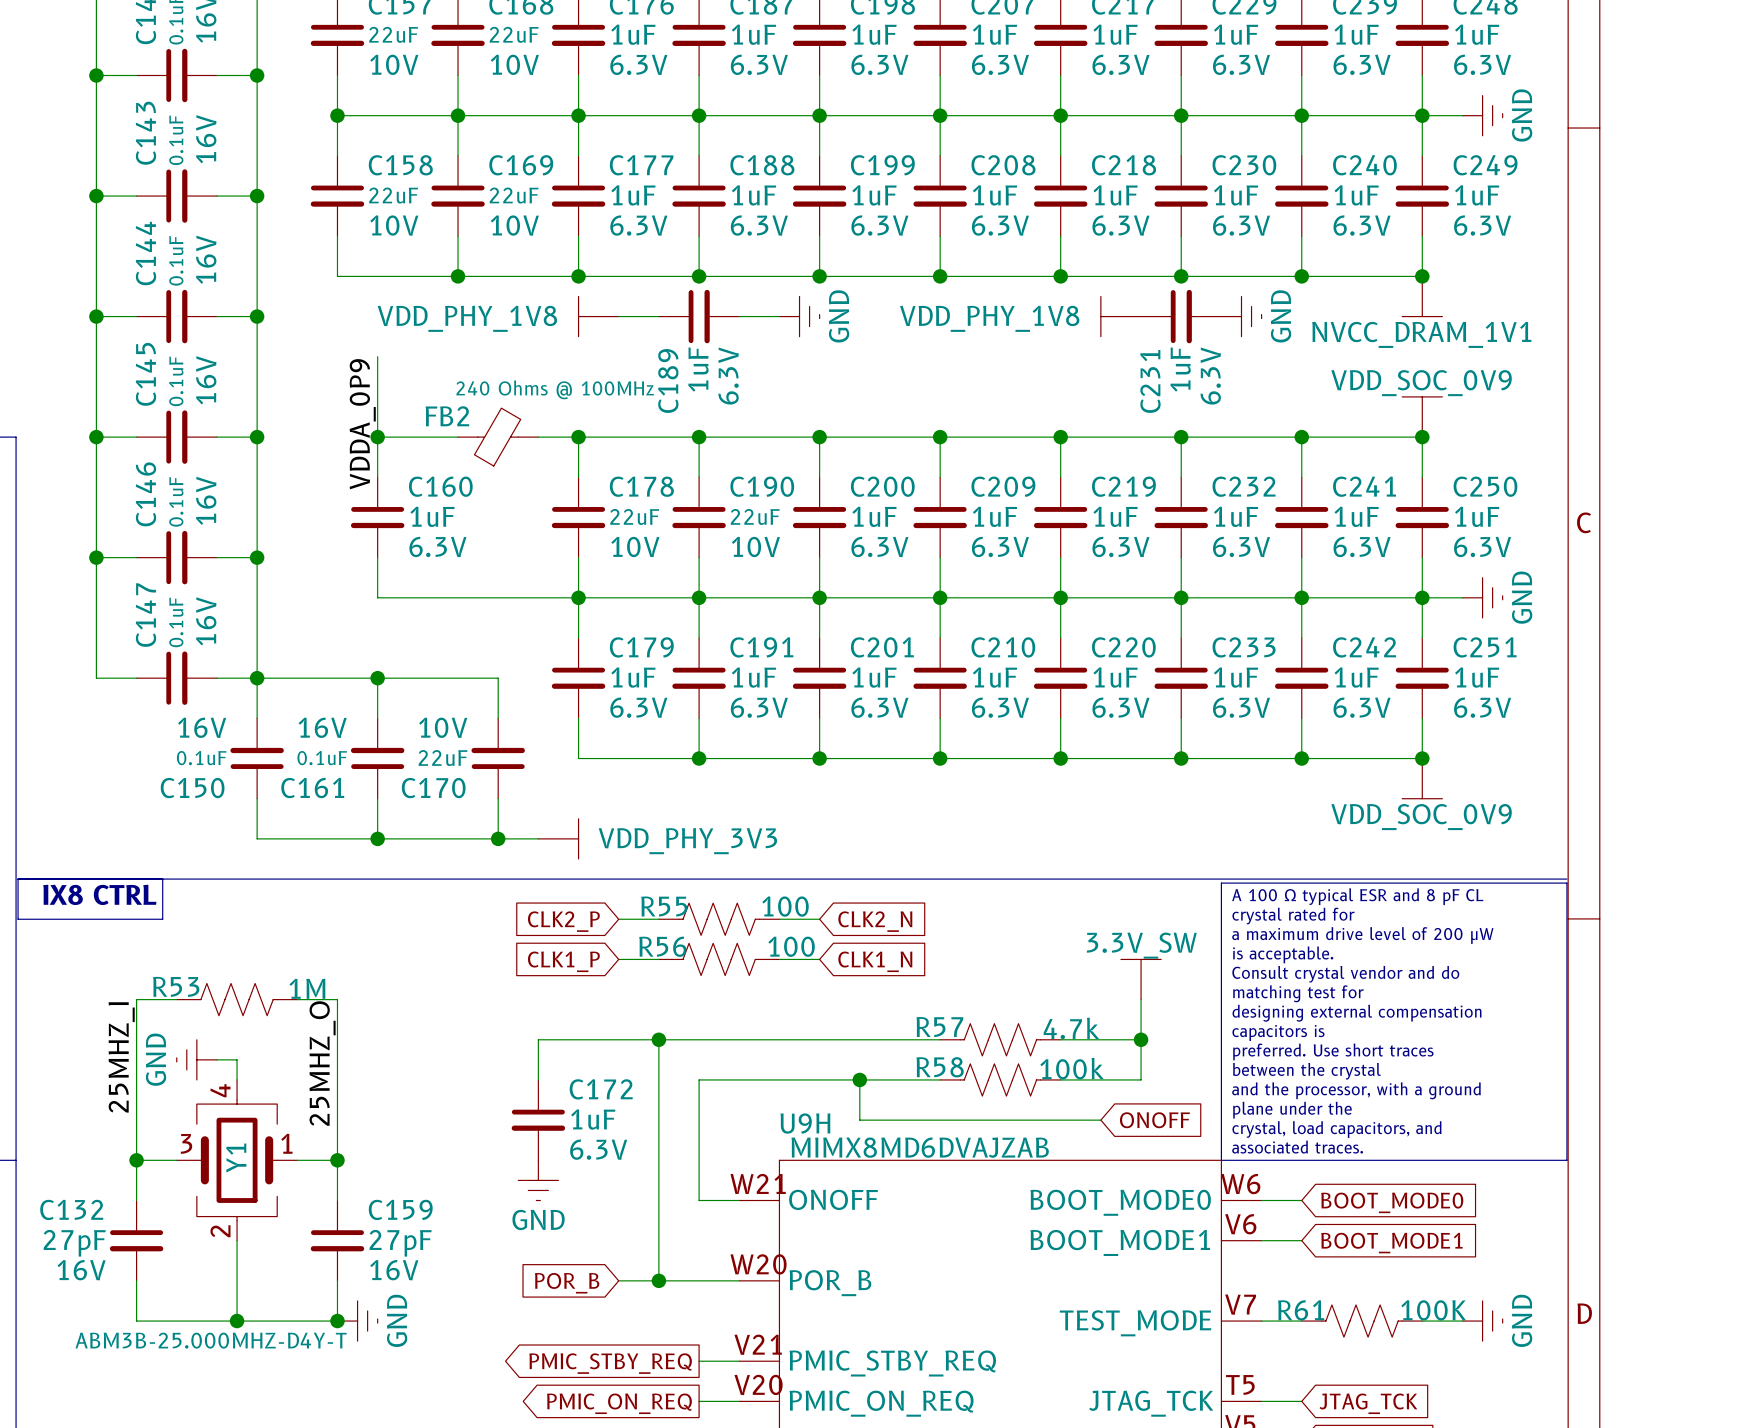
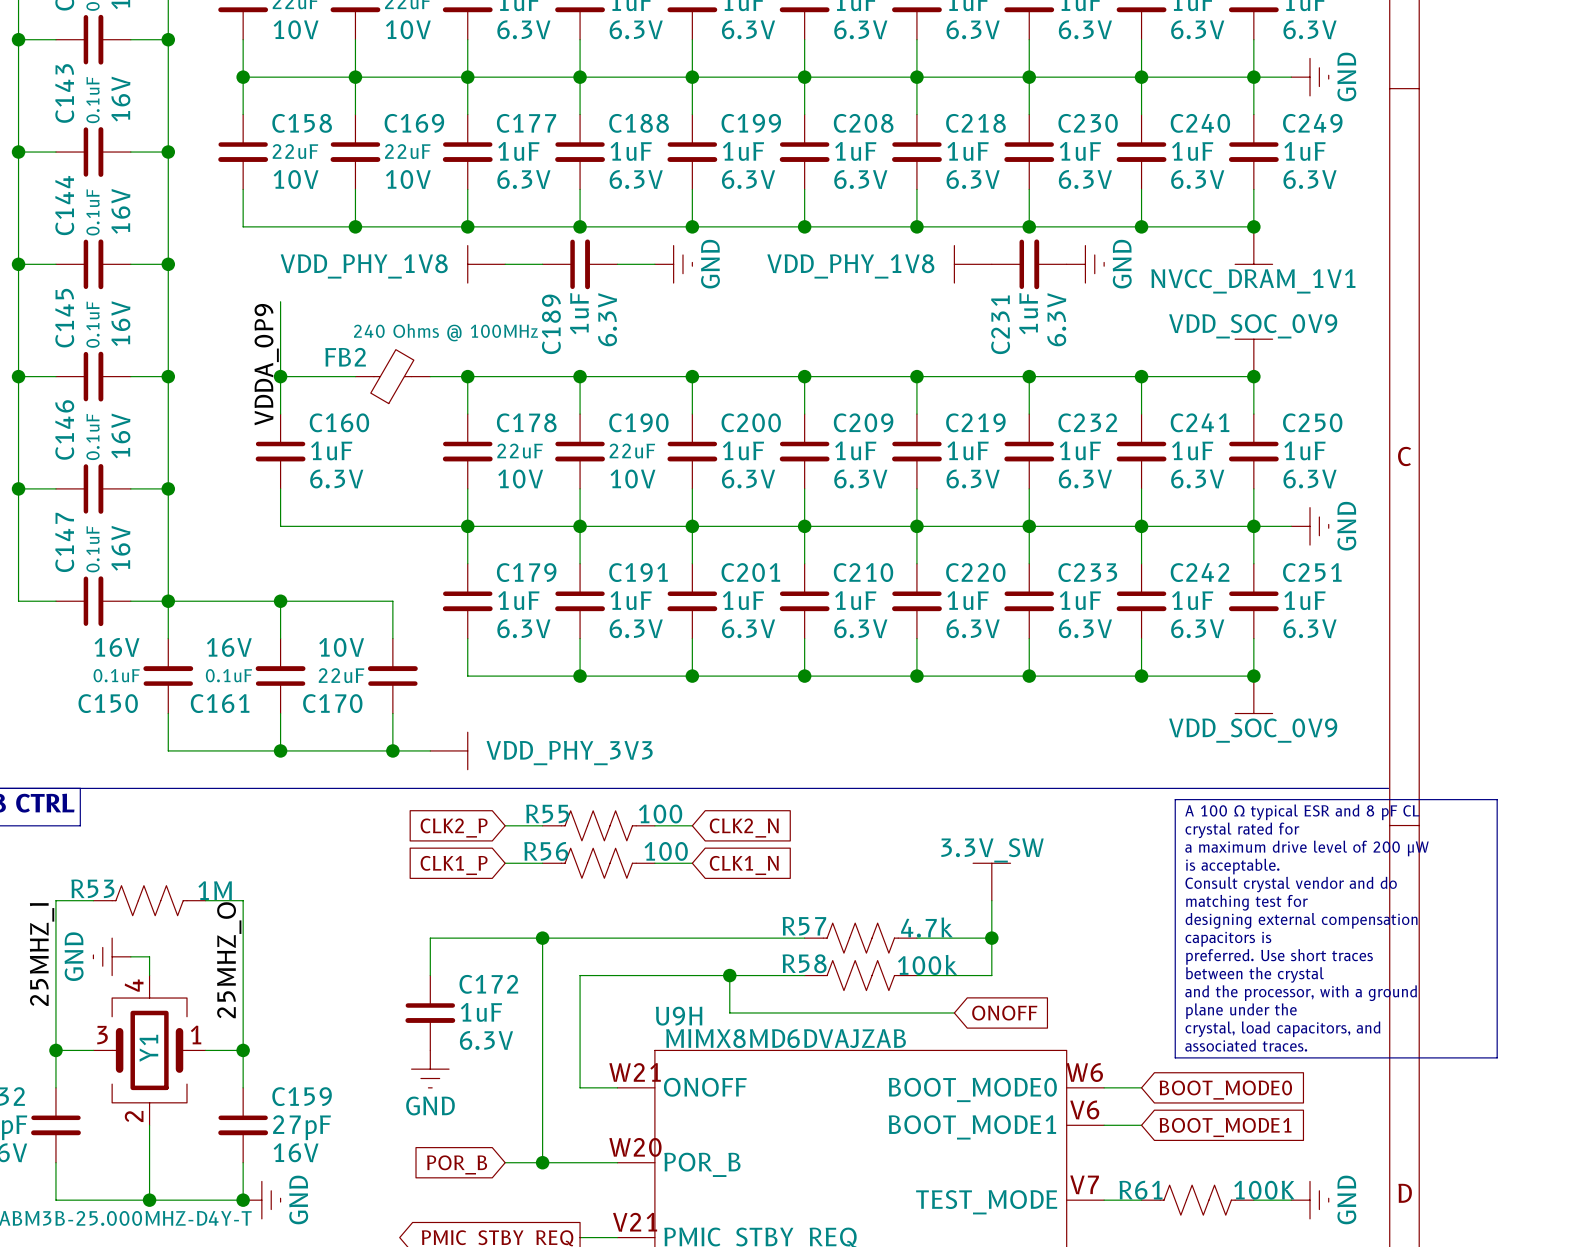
line: (1221, 883) (1566, 883) (1566, 1160) (1221, 1160) (1221, 883) -> (1175, 799) (1497, 799) (1497, 1057) (1175, 1057) (1175, 799)
text position: A 100 Ω typical ESR and 8 pF CL (1357, 896) -> A 100 Ω typical ESR and 8 pF CL (1302, 812)
text position: crystal rated for (1293, 916) -> crystal rated for (1242, 830)
text position: a maximum drive level of 200 μW (1362, 935) -> a maximum drive level of 200 μW (1307, 848)
text position: is acceptable. (1283, 954) -> is acceptable. (1232, 866)
text position: Consult crystal vendor and do (1345, 974) -> Consult crystal vendor and do (1291, 884)
text position: matching test for (1298, 993) -> matching test for (1247, 902)
text position: designing external compensation (1356, 1013) -> designing external compensation (1301, 920)
text position: capacitors is (1278, 1033) -> capacitors is (1228, 939)
text position: preferred. Use short traces (1333, 1051) -> preferred. Use short traces (1279, 956)
text position: between the crystal (1306, 1071) -> between the crystal (1254, 974)
text position: and the processor, with a ground (1356, 1090) -> and the processor, with a ground (1301, 993)
text position: plane under the (1292, 1110) -> plane under the (1241, 1011)
text position: crystal, load capacitors, and (1337, 1129) -> crystal, load capacitors, and (1282, 1029)
text position: associated traces. (1297, 1147) -> associated traces. (1246, 1045)

